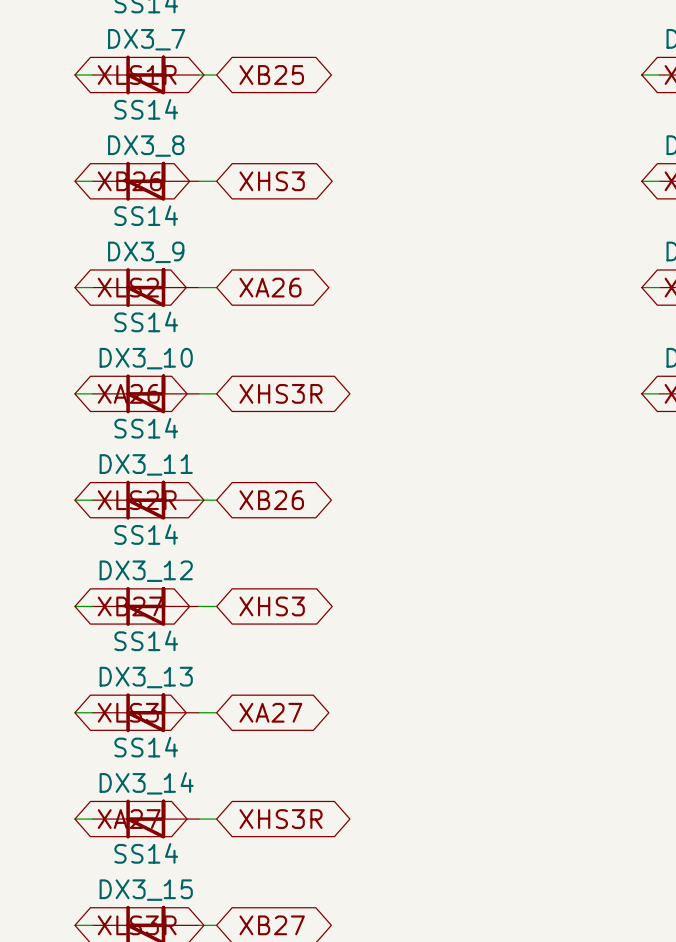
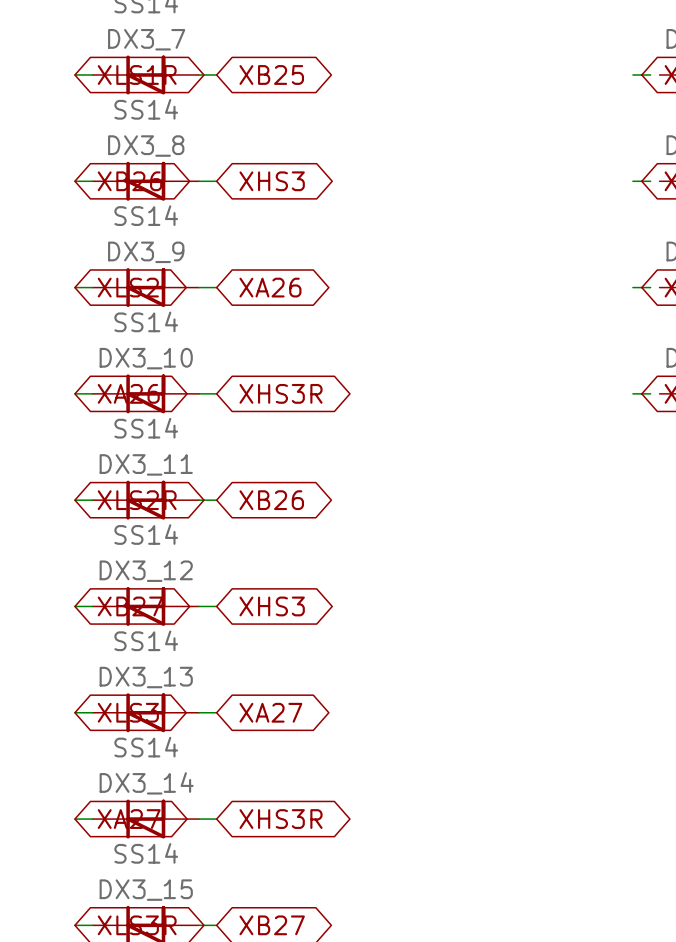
wire: (650, 74) (659, 74) -> (632, 74) (641, 74)
wire: (650, 181) (659, 181) -> (632, 181) (641, 181)
wire: (650, 287) (659, 287) -> (632, 287) (641, 287)
wire: (650, 393) (659, 393) -> (632, 393) (641, 393)

